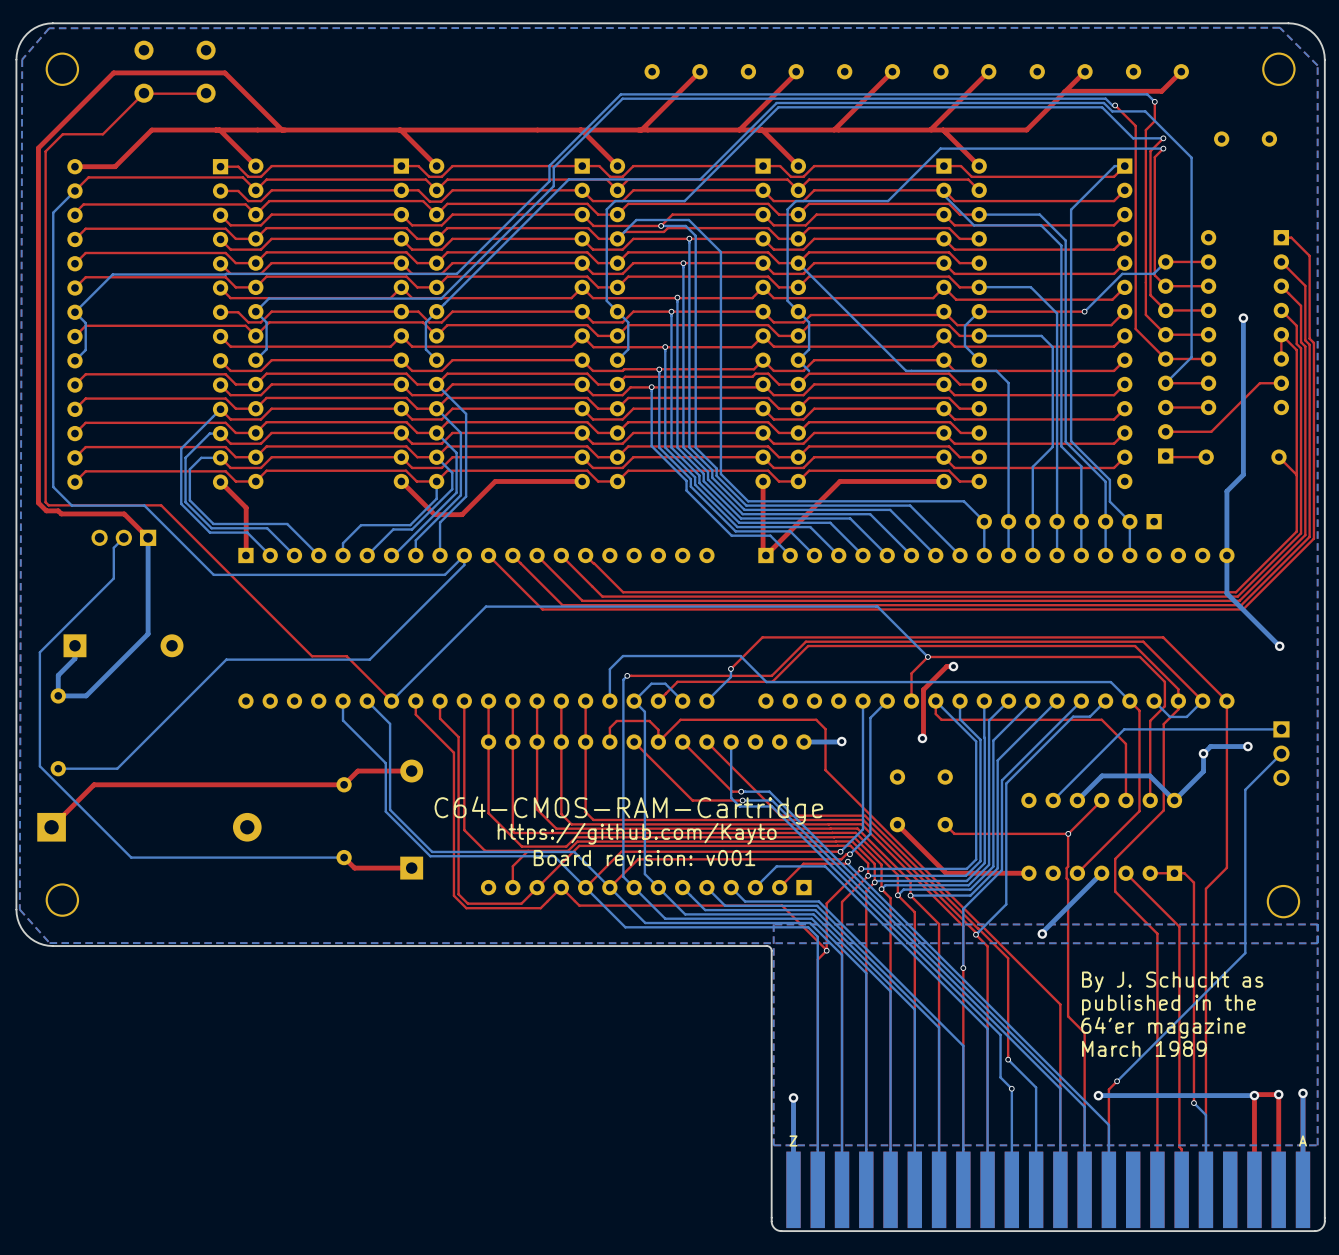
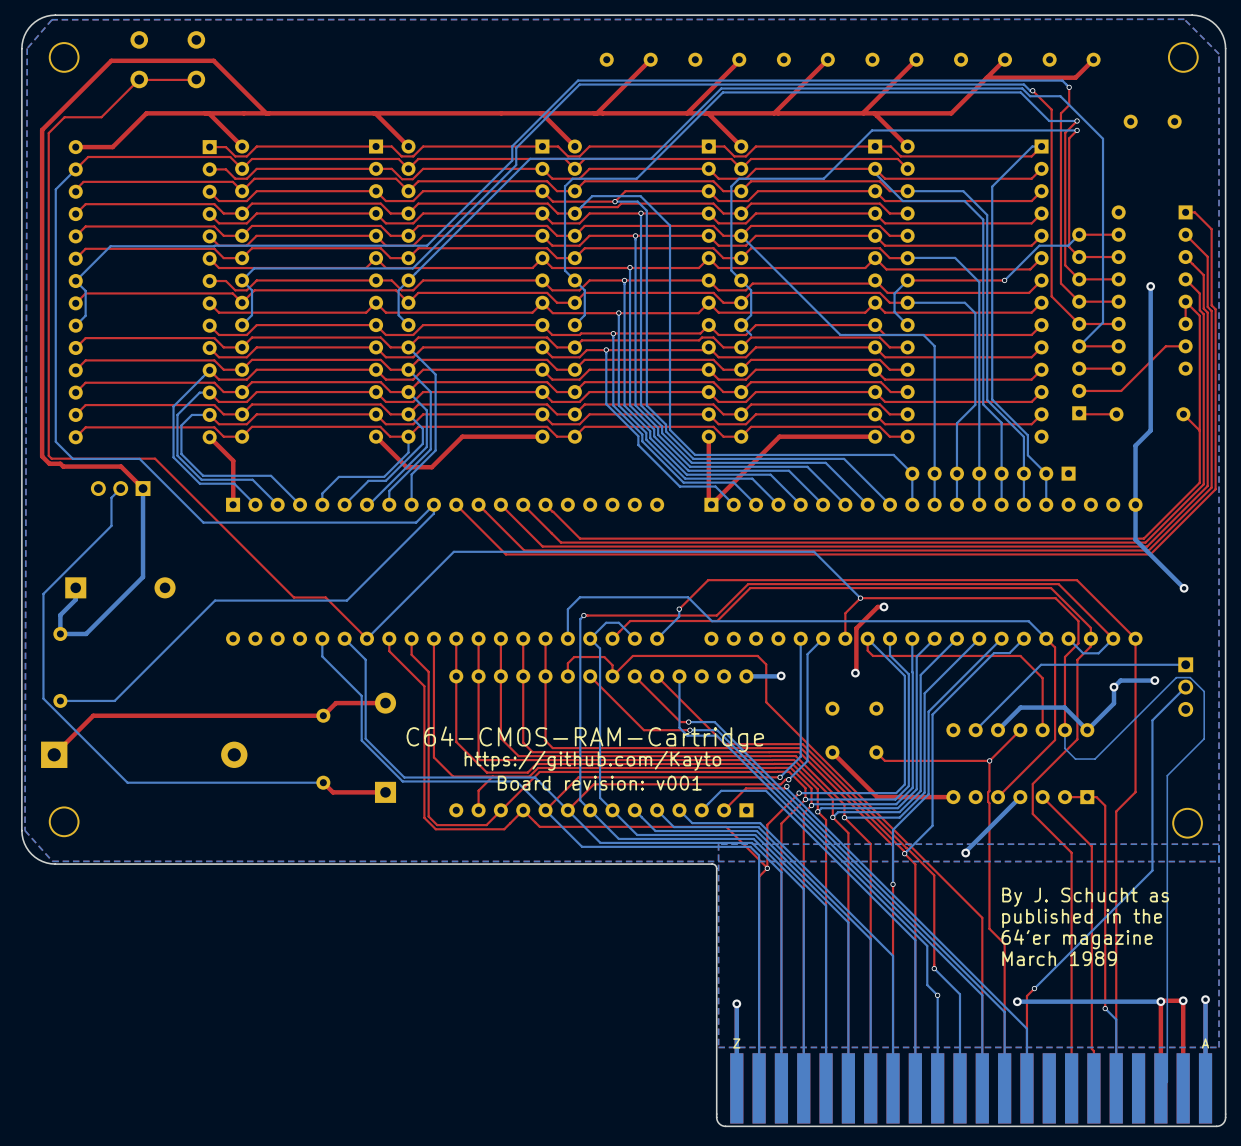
bottom track: none -> (1064, 730) (1064, 748) (1075, 759) (1095, 759) (1176, 677) (1190, 677) (1204, 691) (1204, 738) (1167, 775) (1167, 1082) (1160, 1088)

